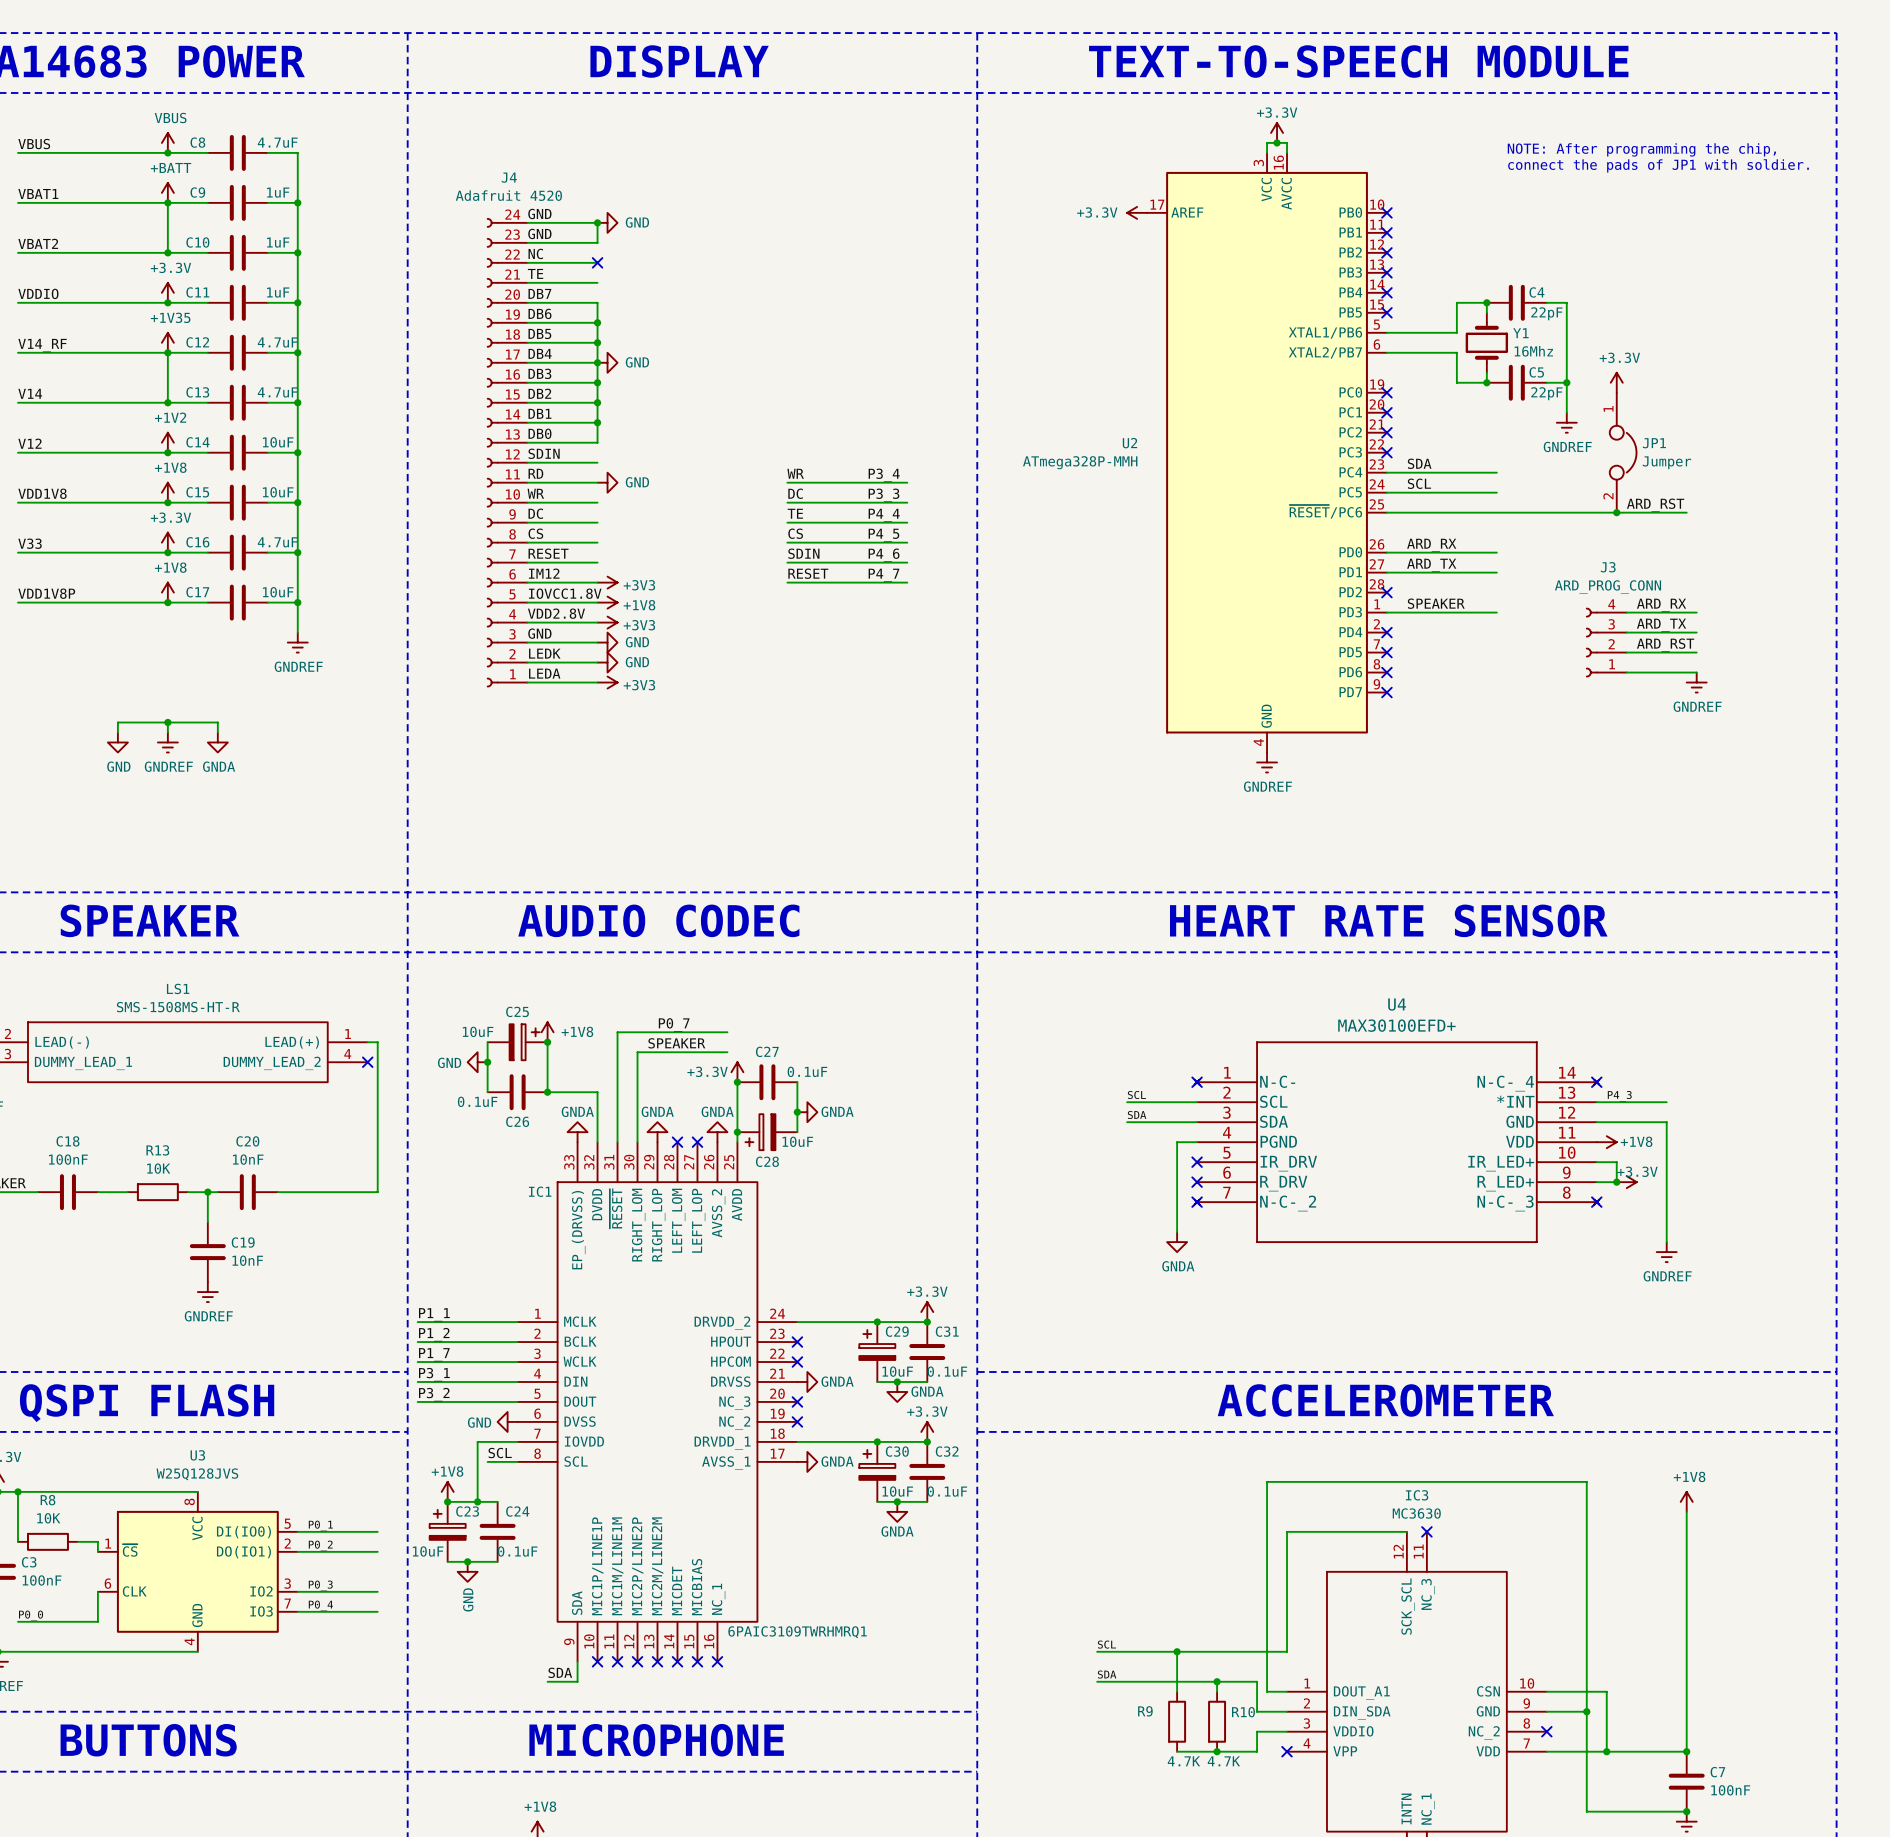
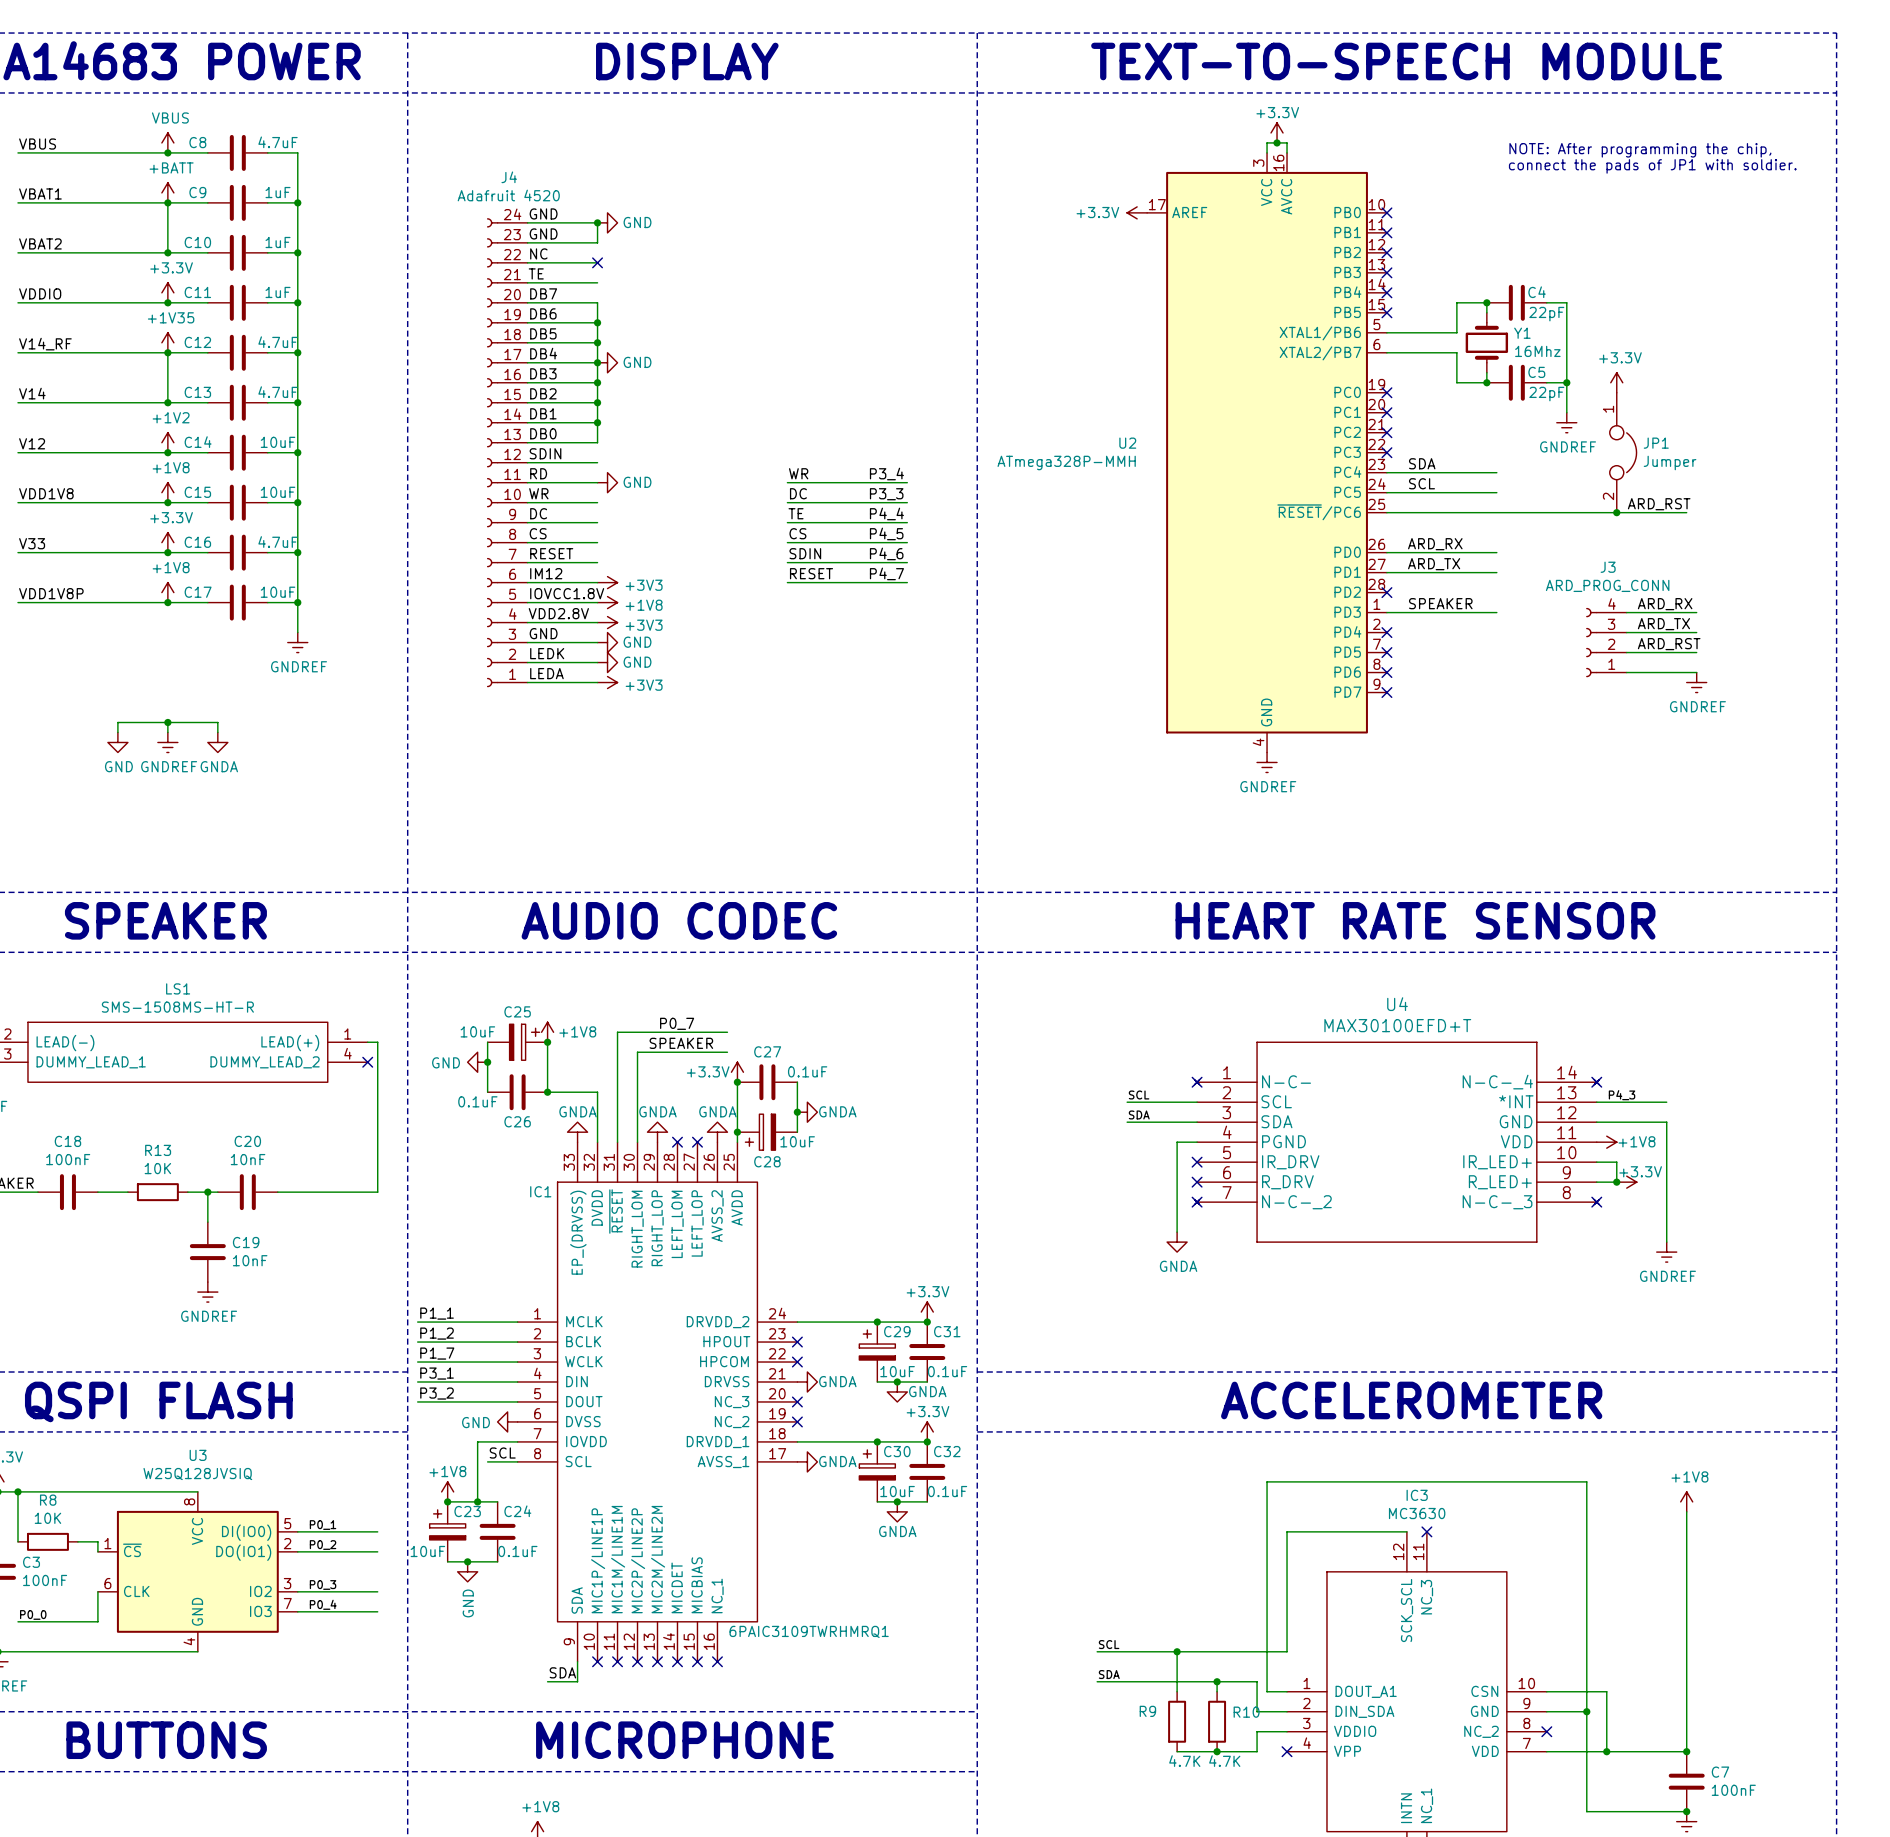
U4 value: MAX30100EFD+ (1396, 1025) -> MAX30100EFD+T (1397, 1025)
U3 value: W25Q128JVS (197, 1474) -> W25Q128JVSIQ (197, 1474)

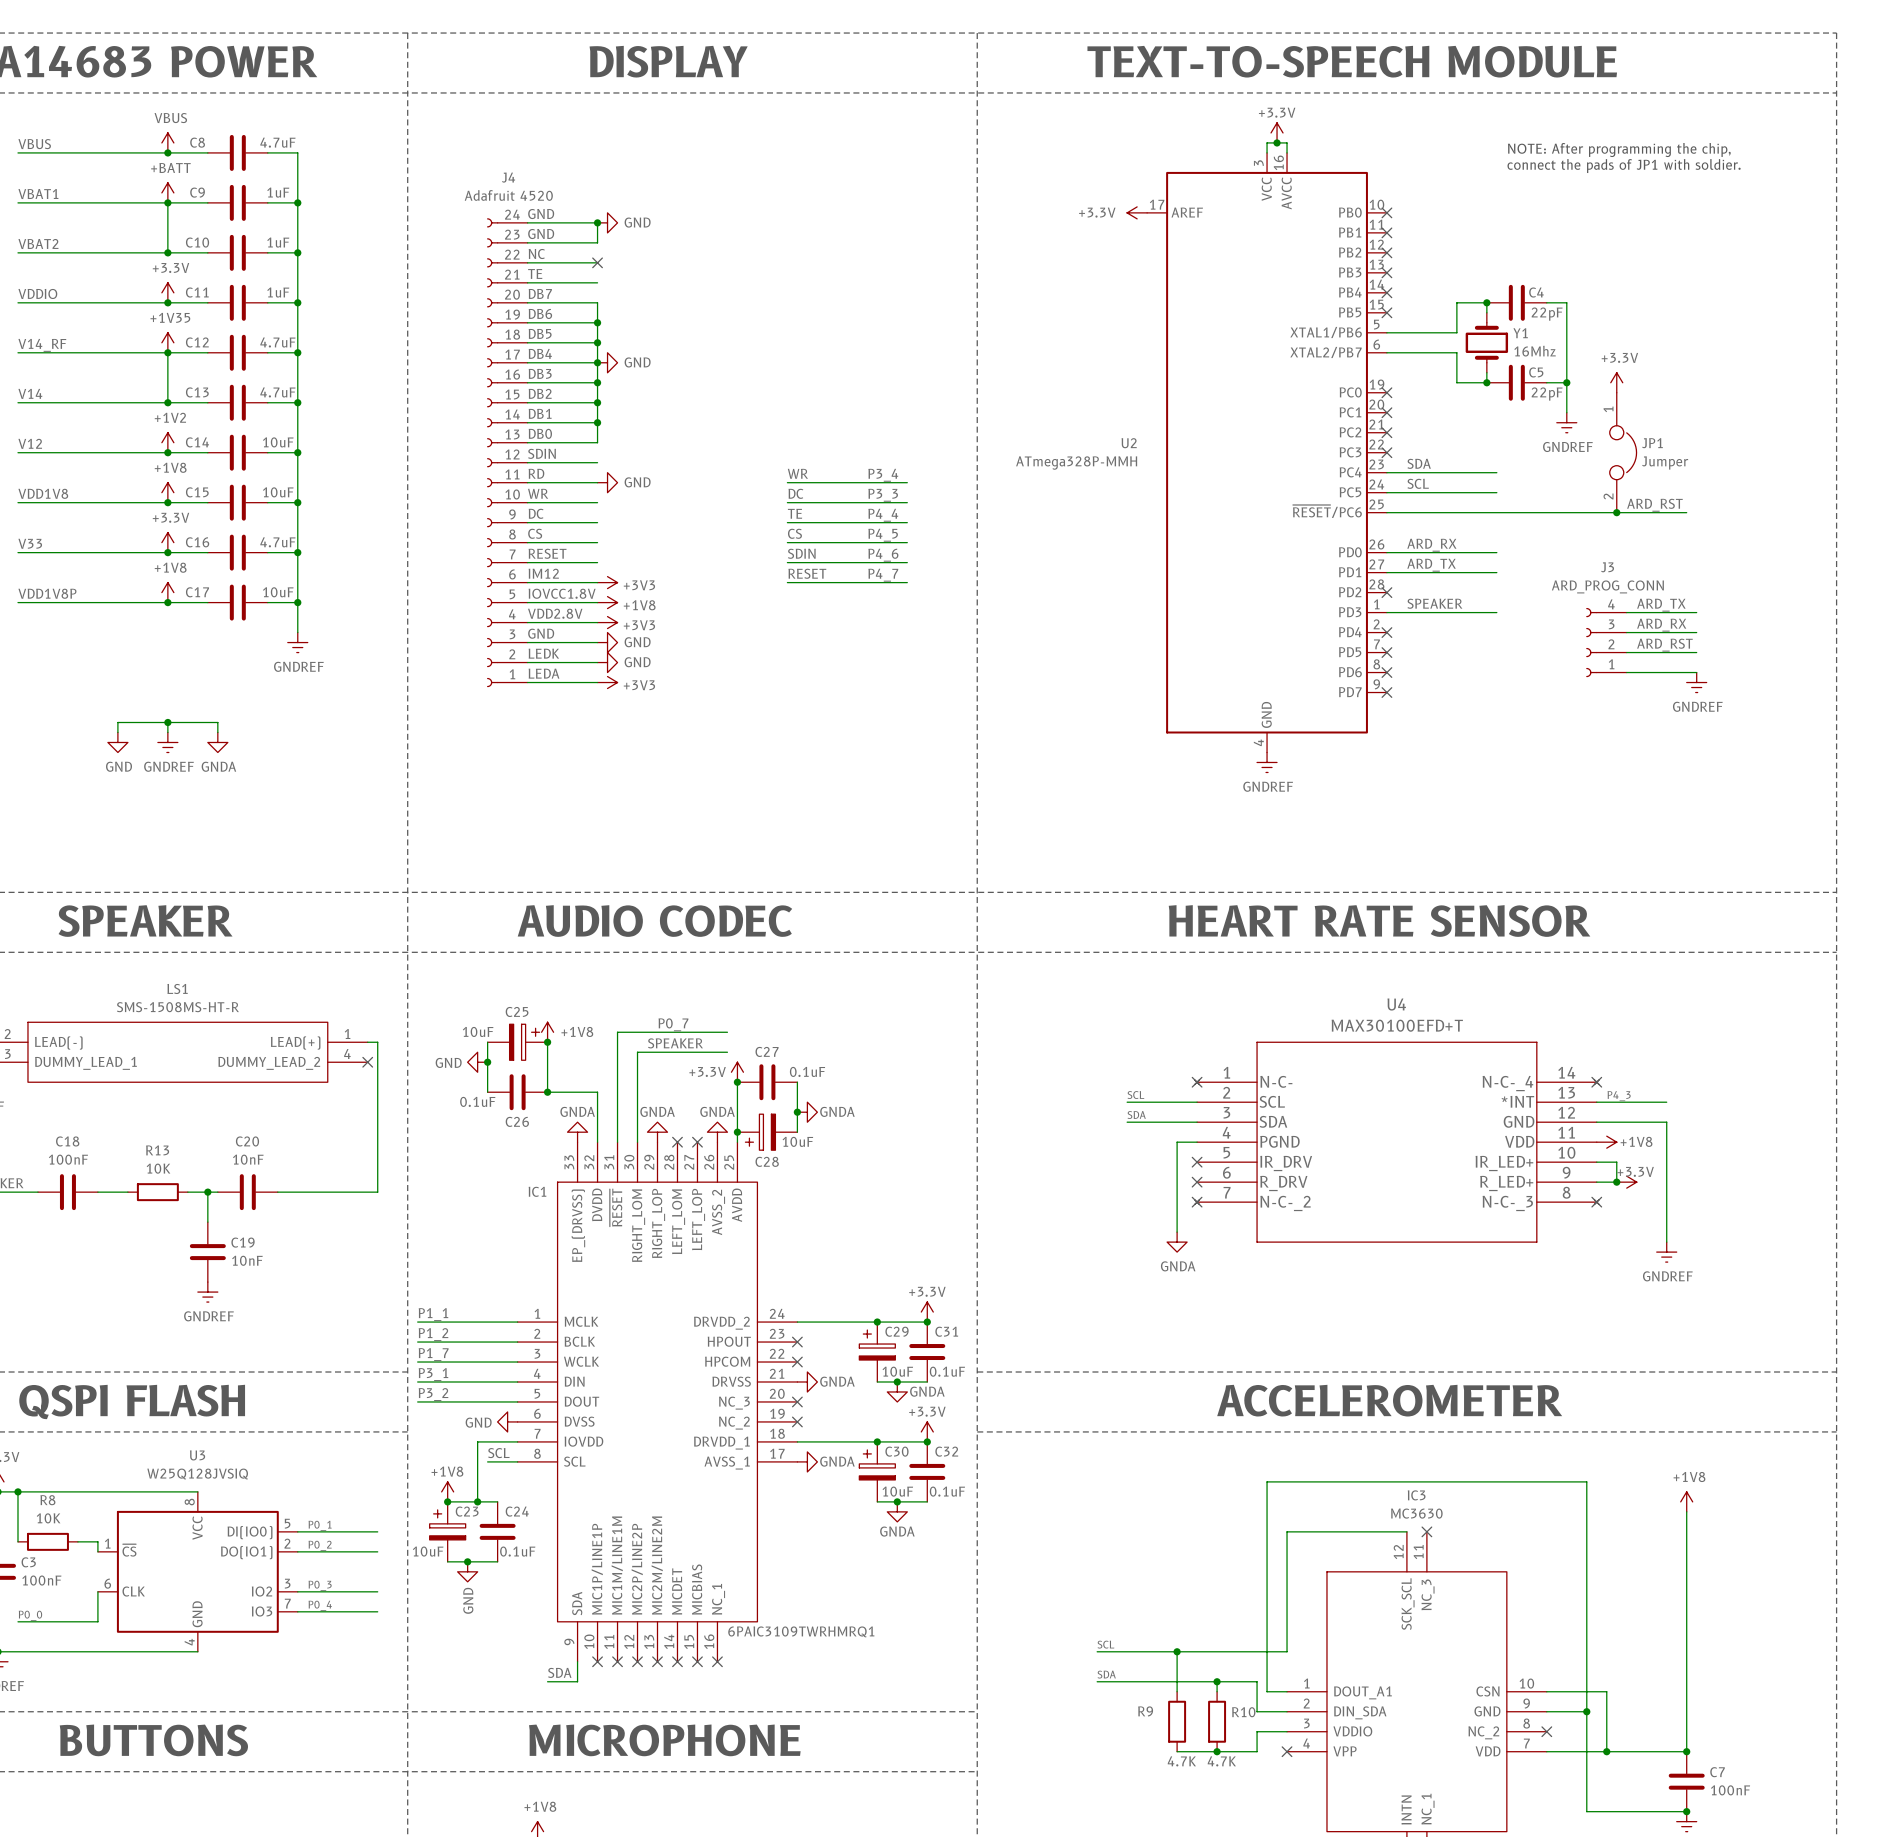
label: ARD_RX (1665, 604) -> ARD_TX (1661, 605)
label: ARD_TX (1663, 624) -> ARD_RX (1661, 625)

